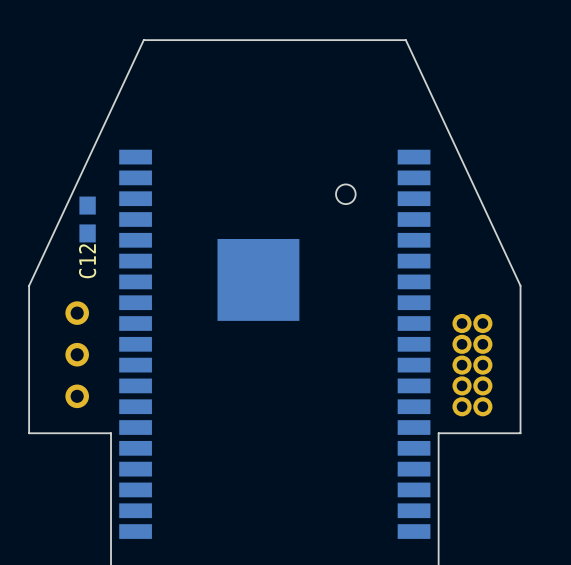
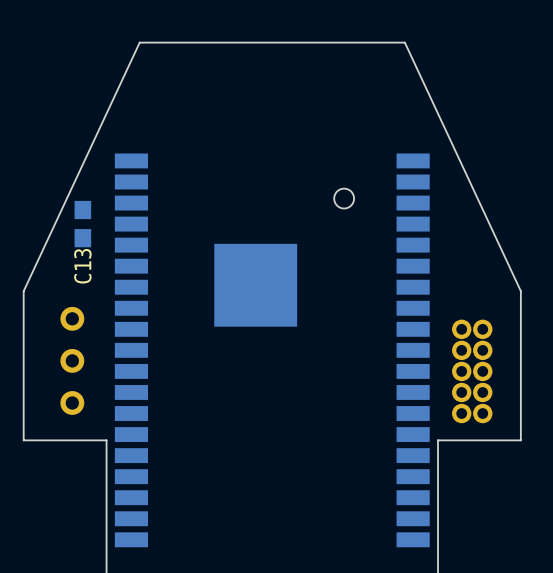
C12 name: C12 (87, 261) -> C13 (82, 266)

